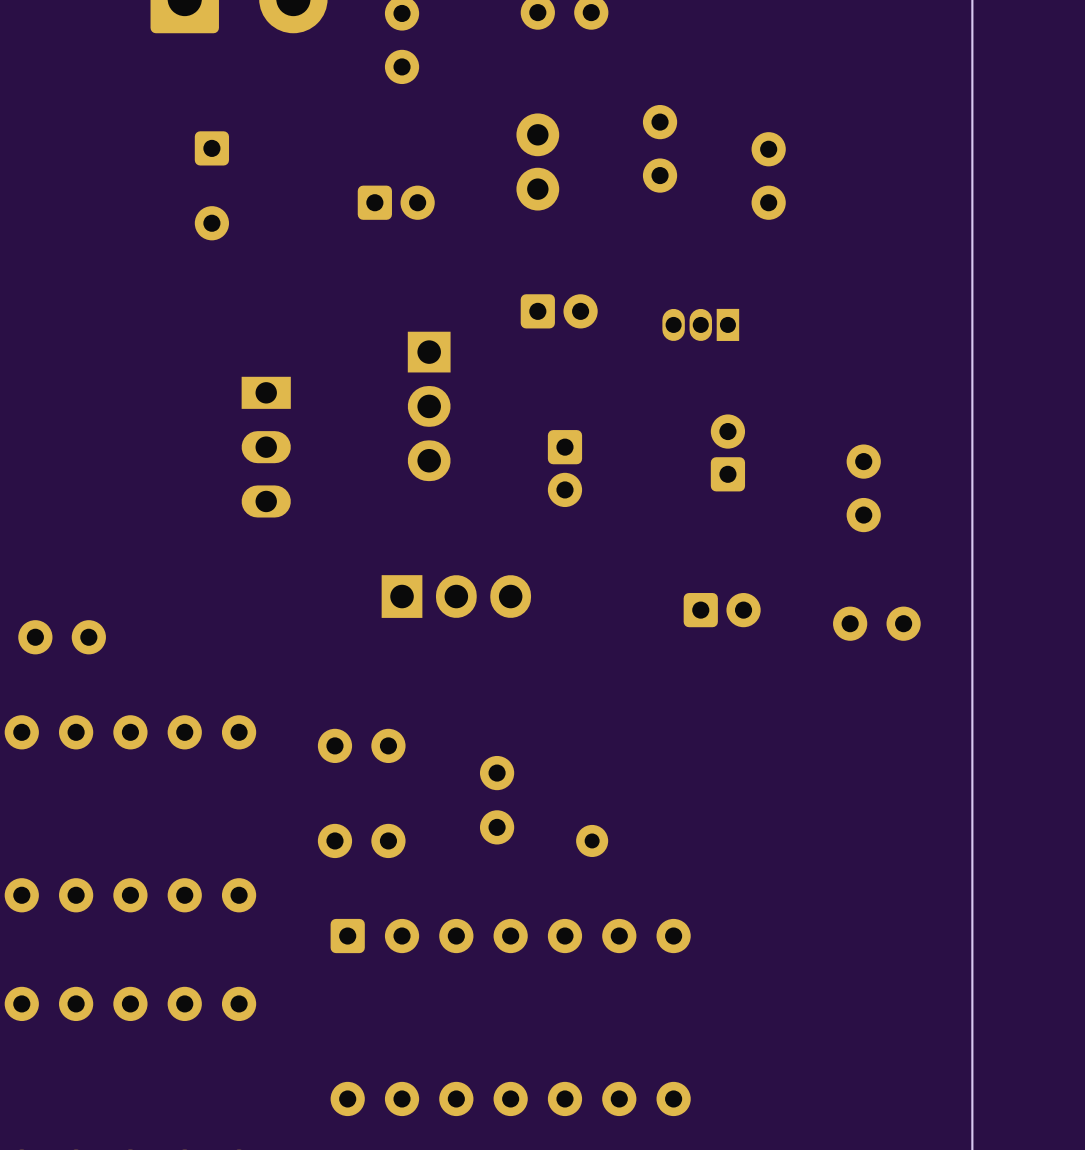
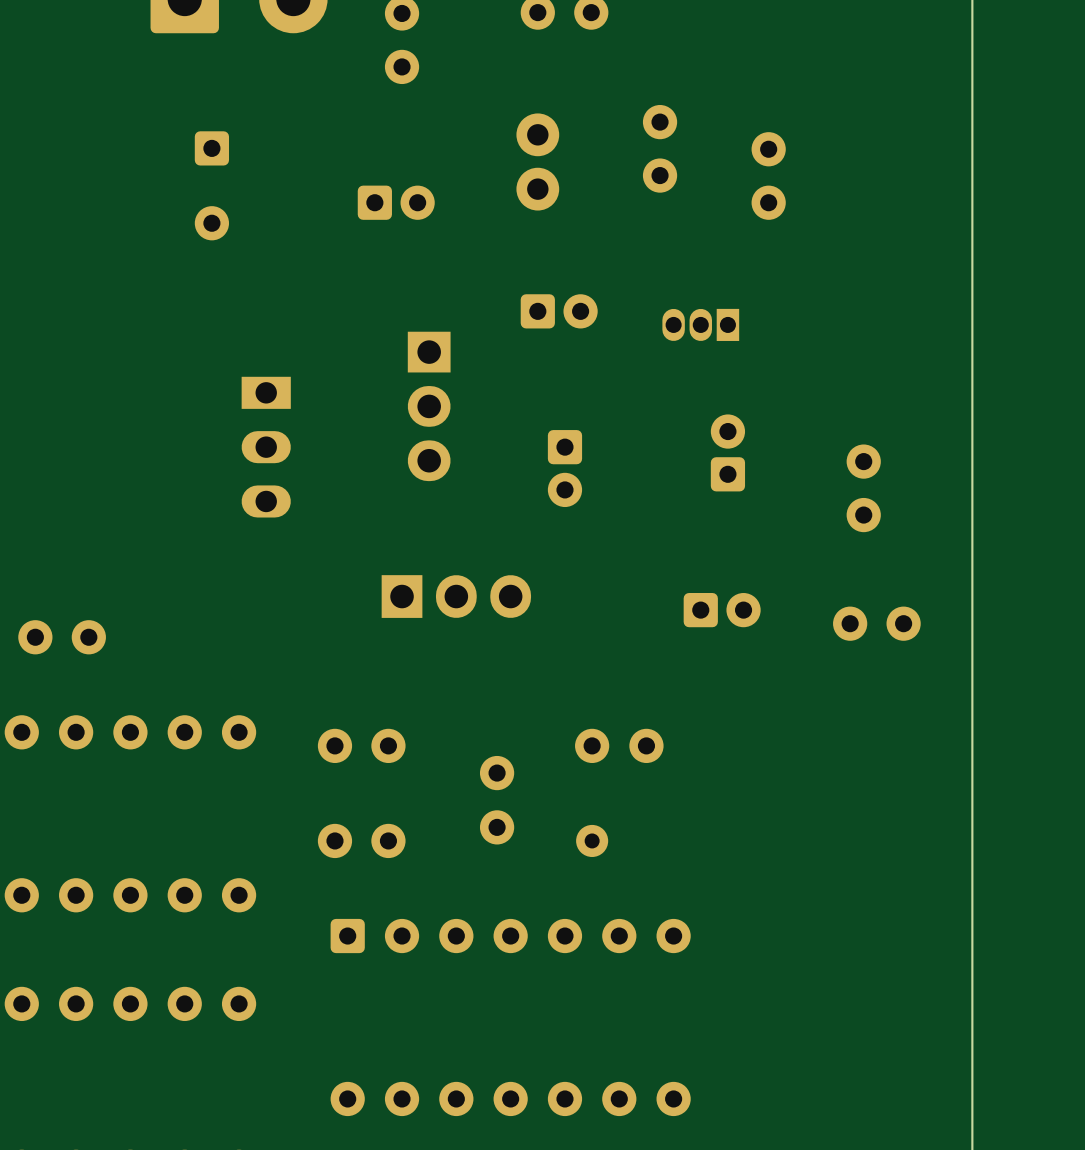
part: none -> (619, 745)

